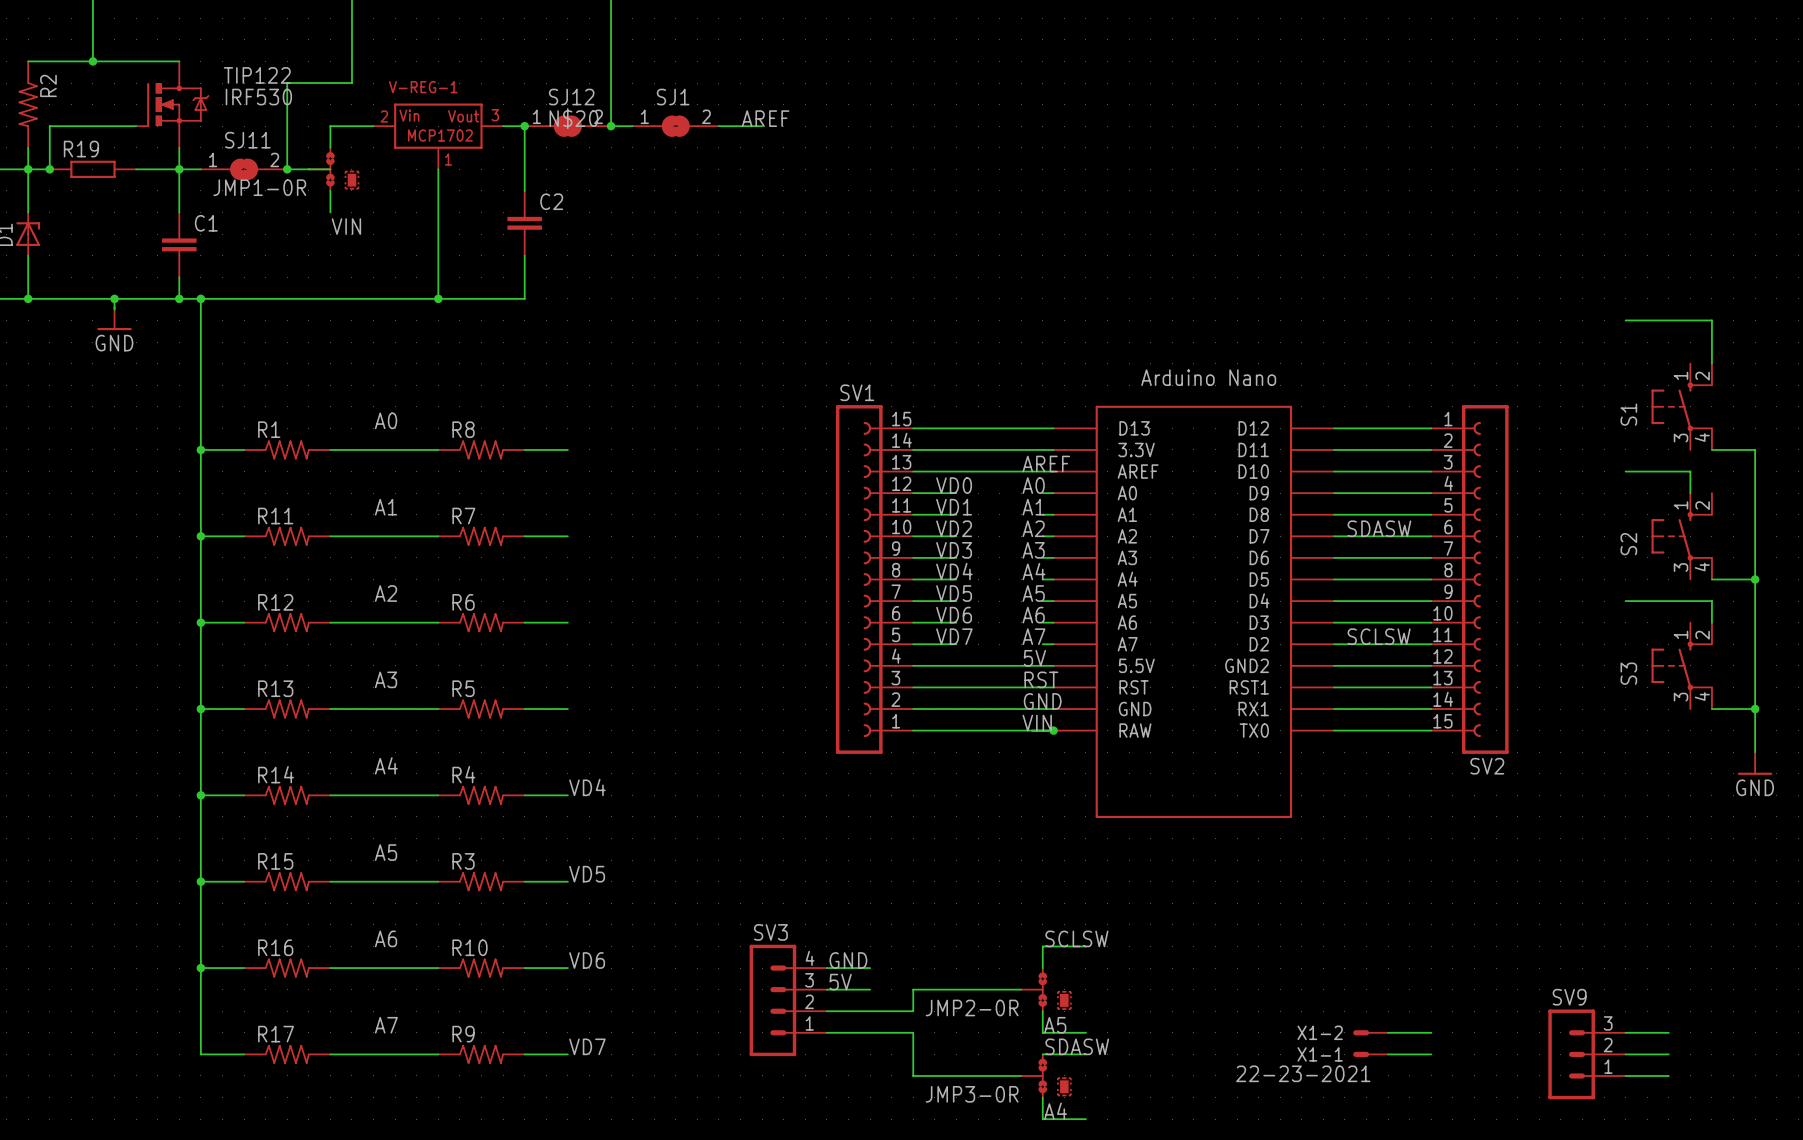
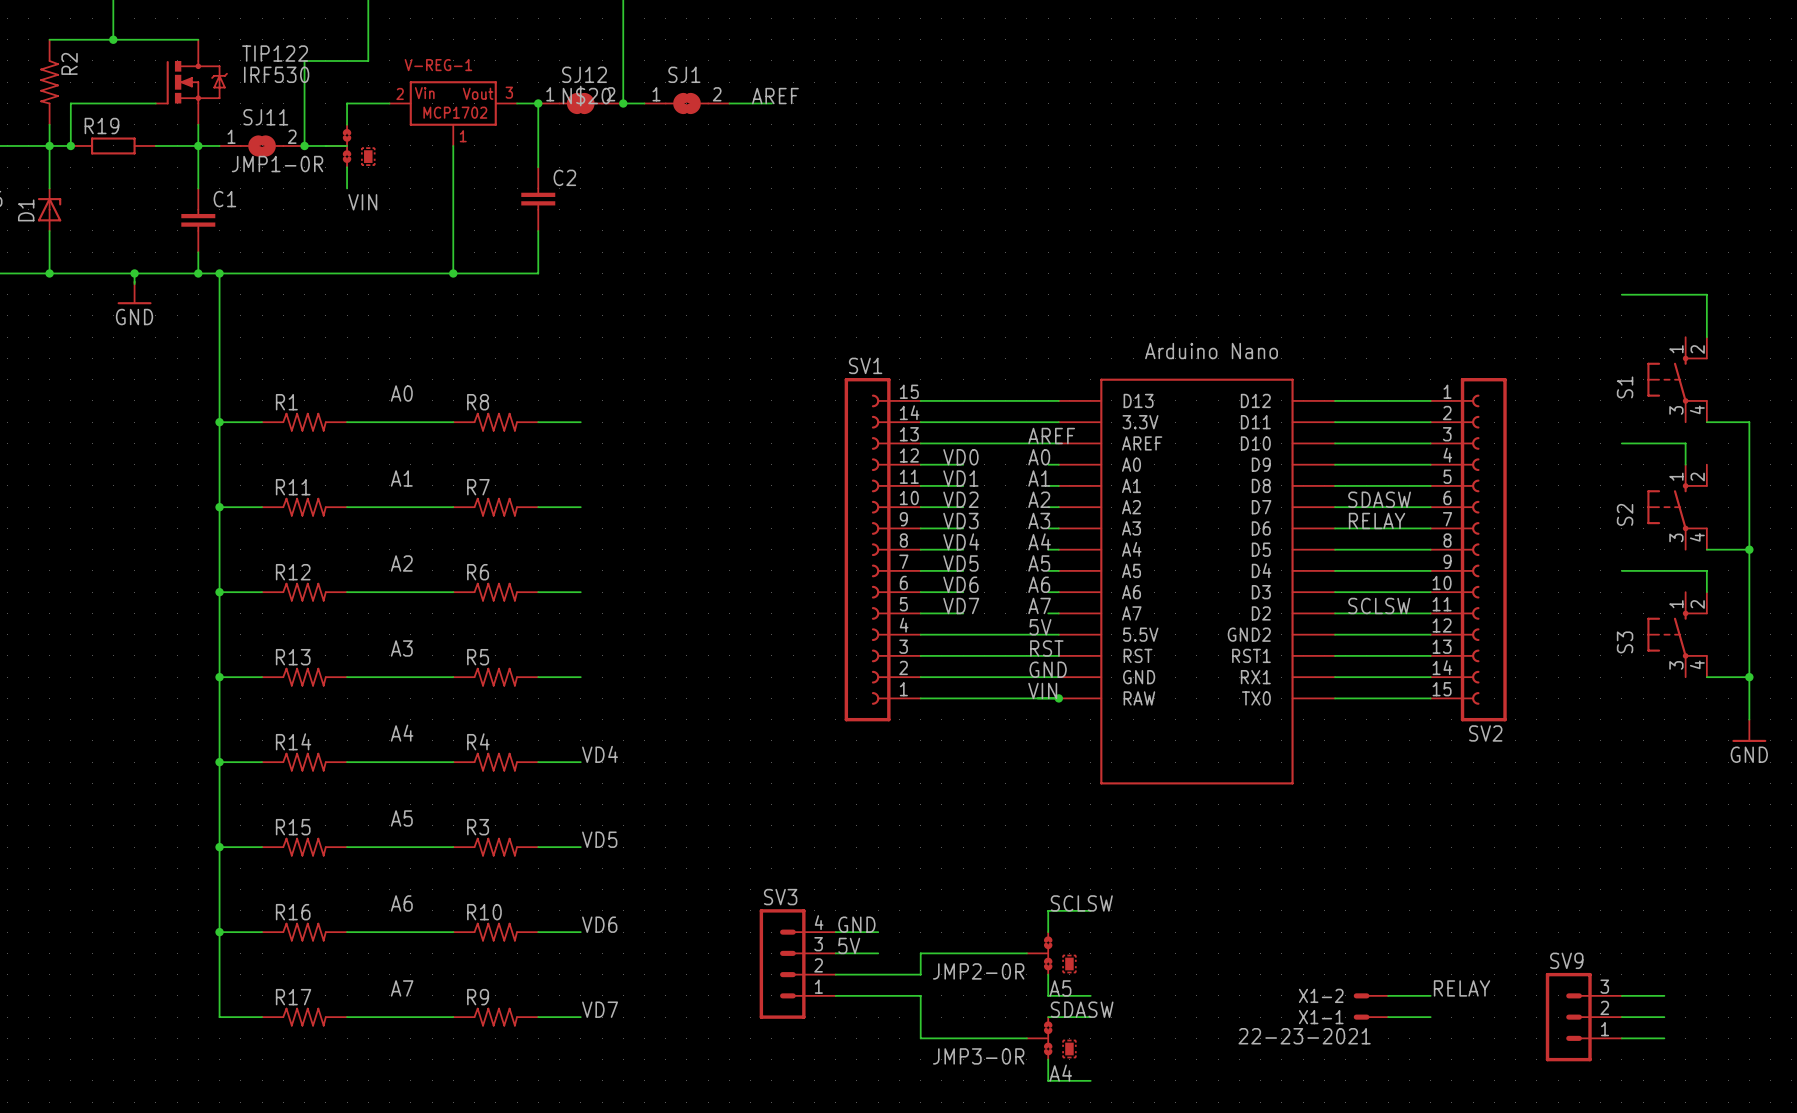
label: none -> RELAY (1377, 521)
label: none -> RELAY (1462, 988)

